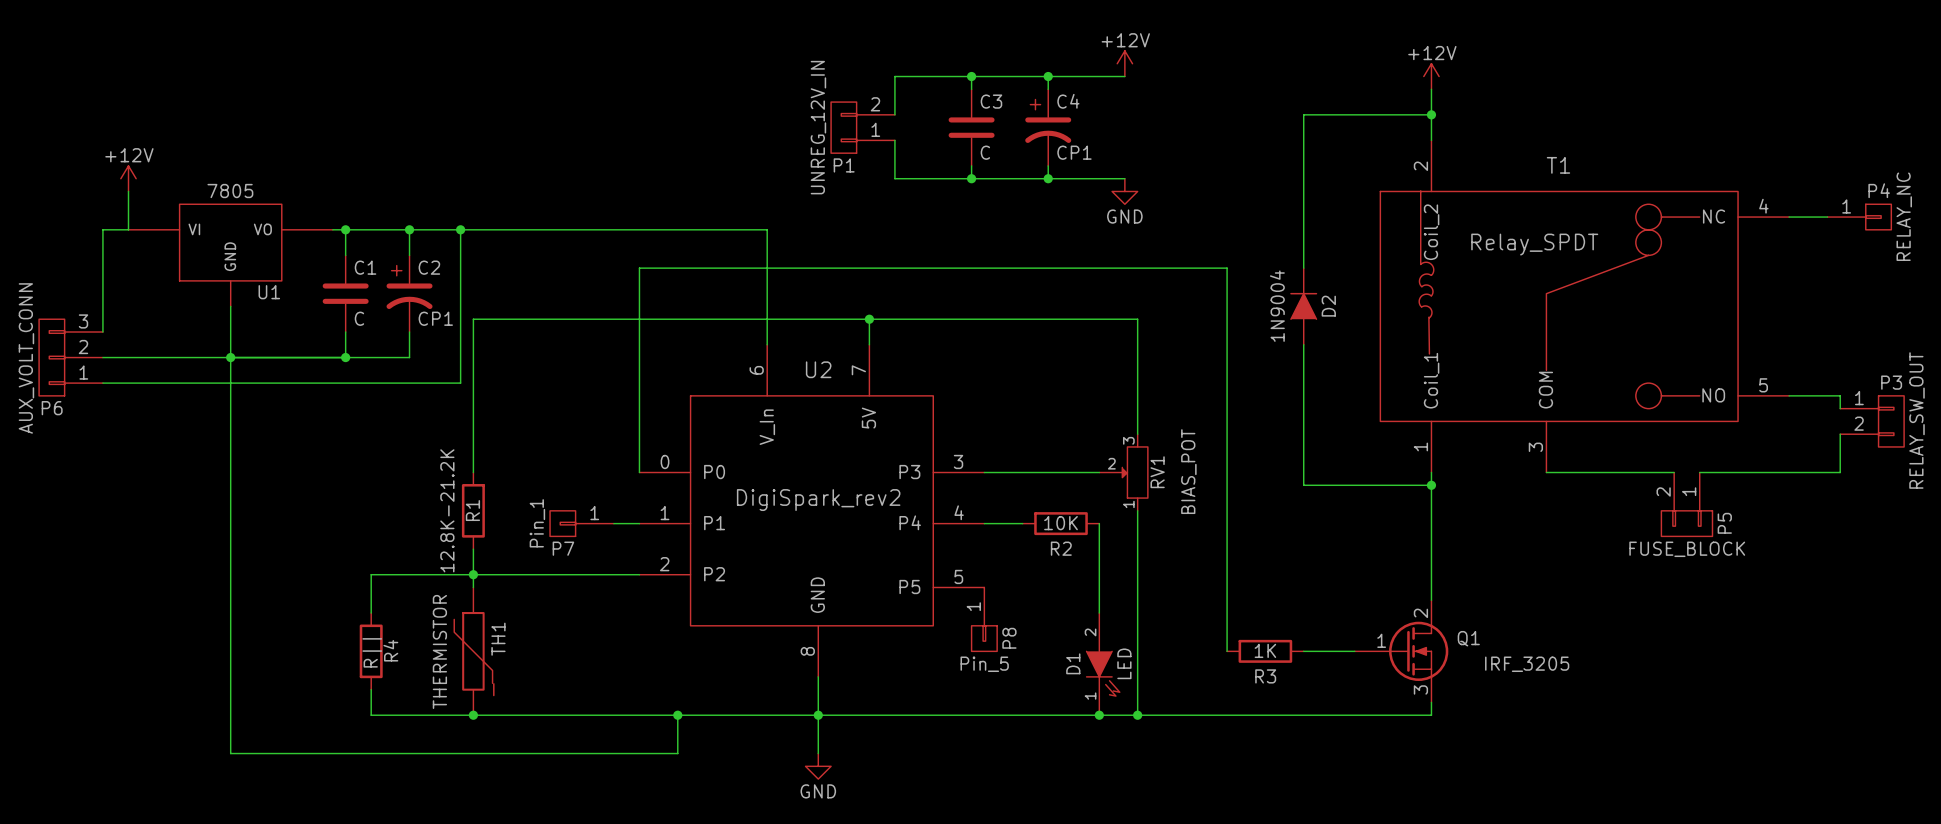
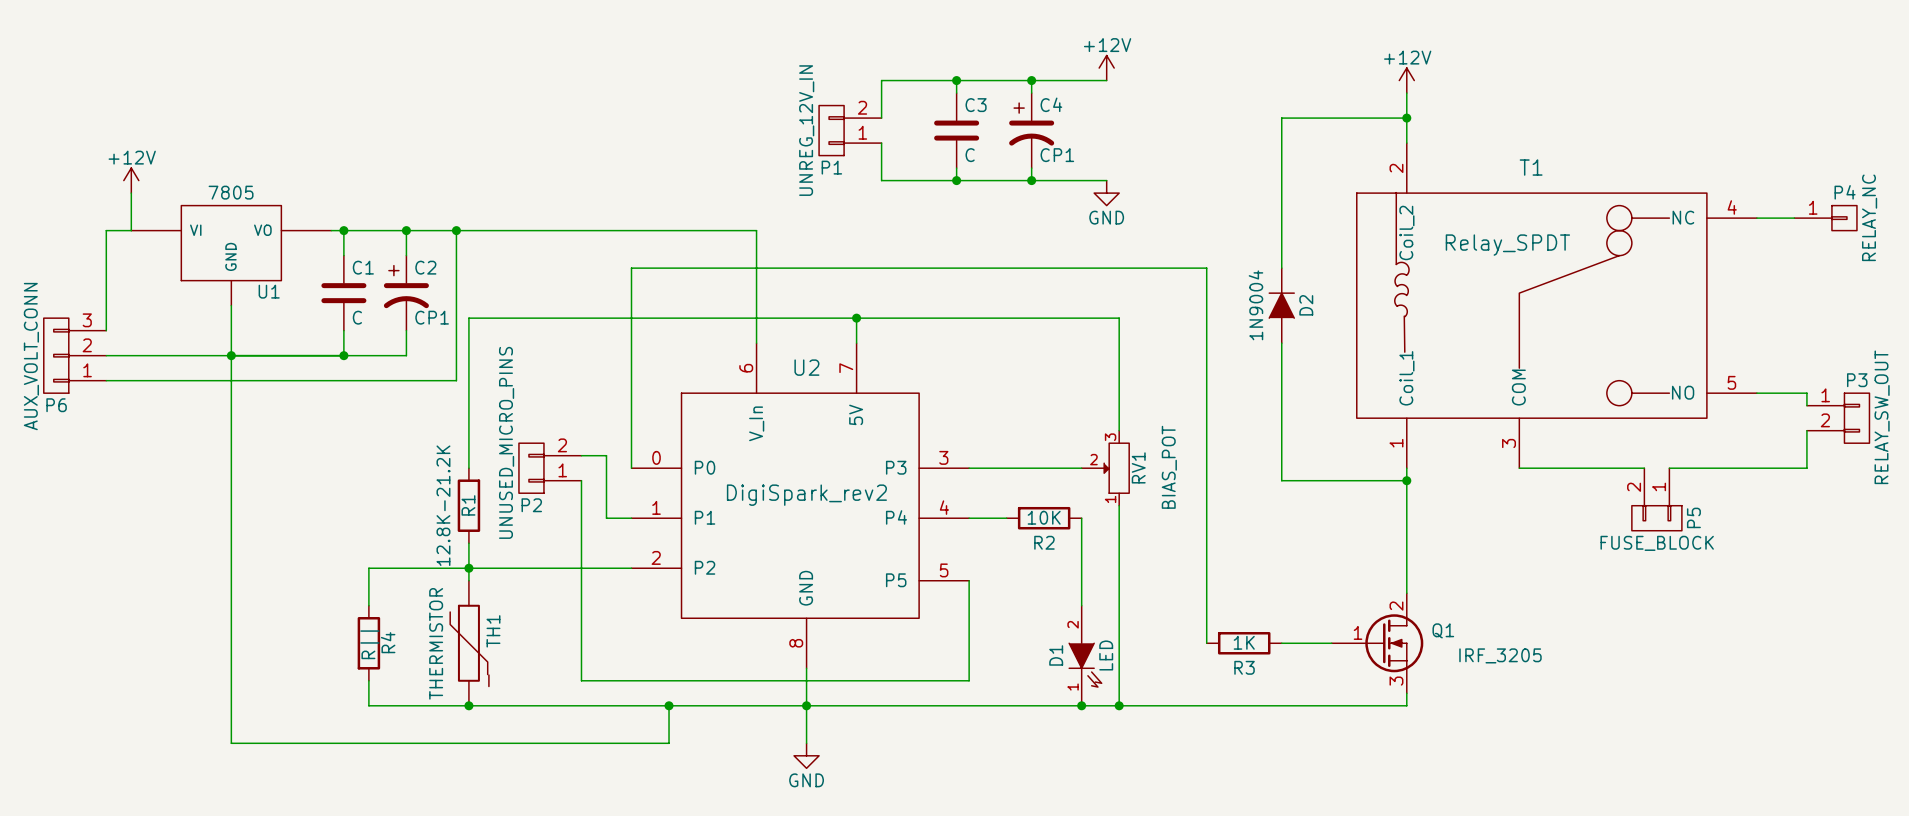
wire: none -> (581, 455) (606, 455) (606, 518)
P2: none -> UNUSED_MICRO_PINS (550, 468)
wire: none -> (581, 480) (581, 680) (969, 680) (969, 580)
P7: Pin_1 (581, 523) -> none
P8: Pin_5 (984, 619) -> none

